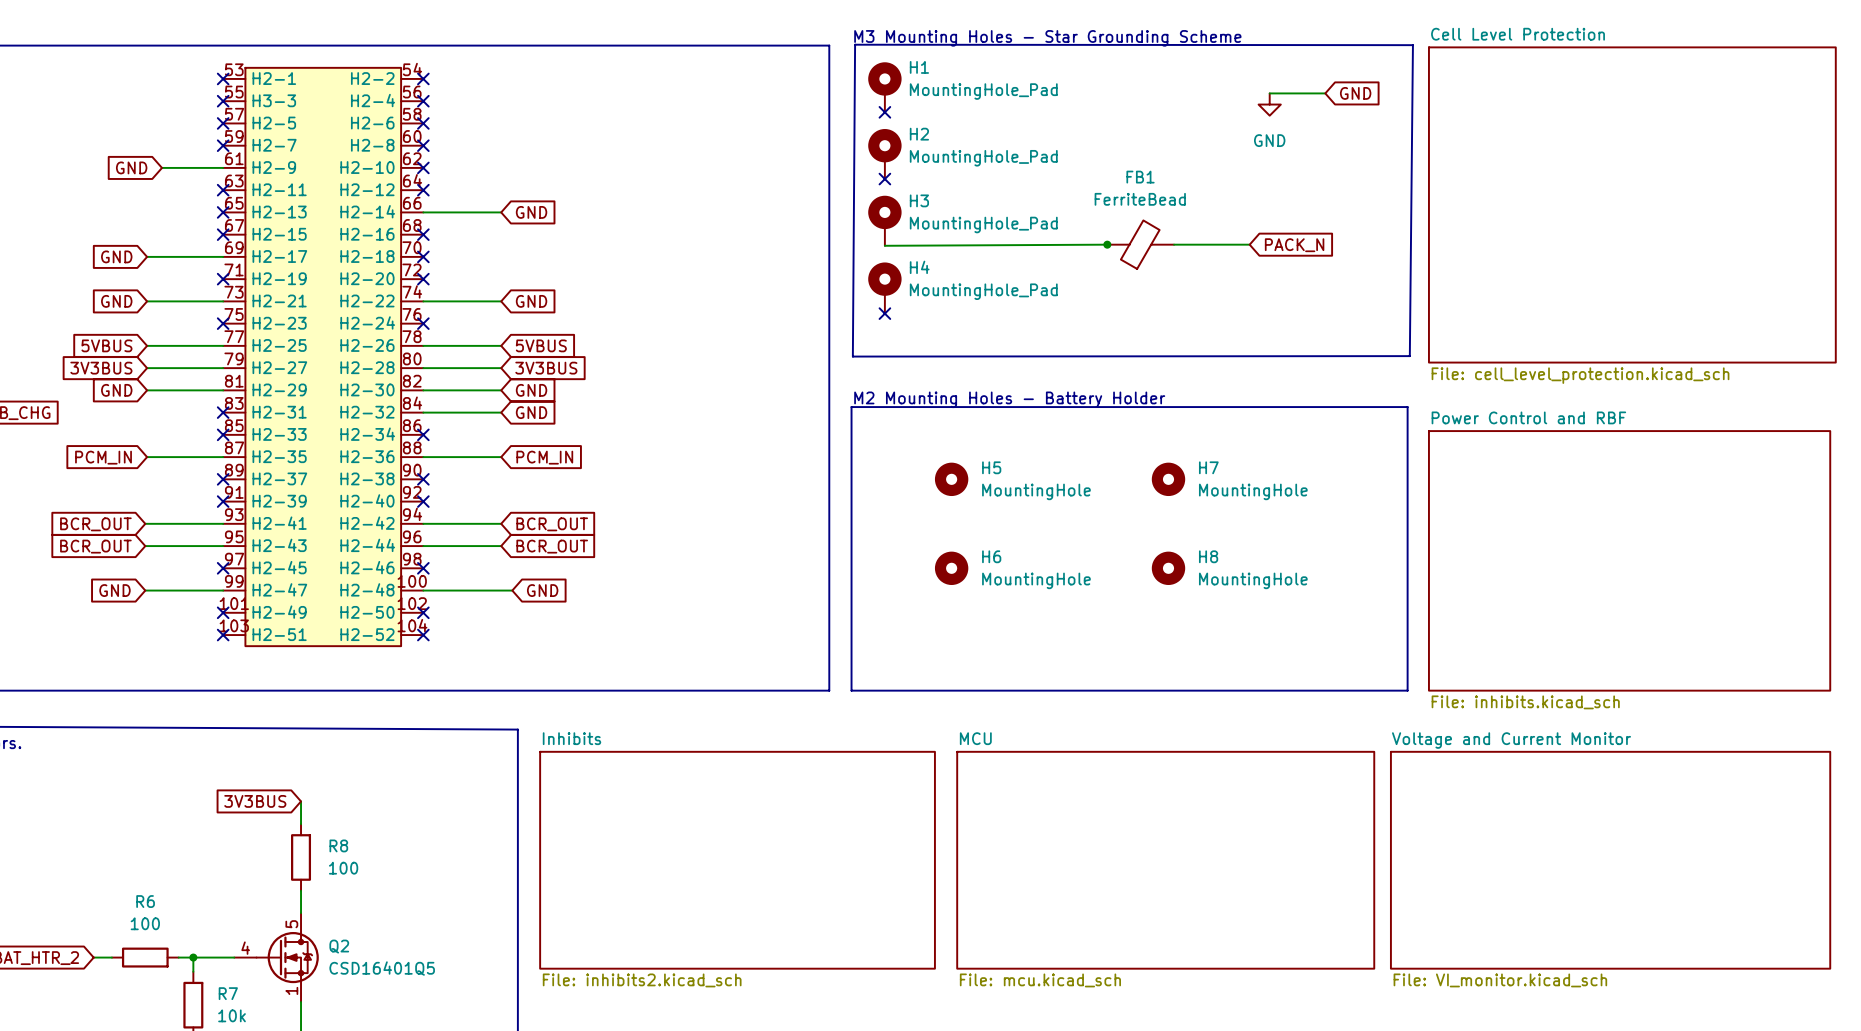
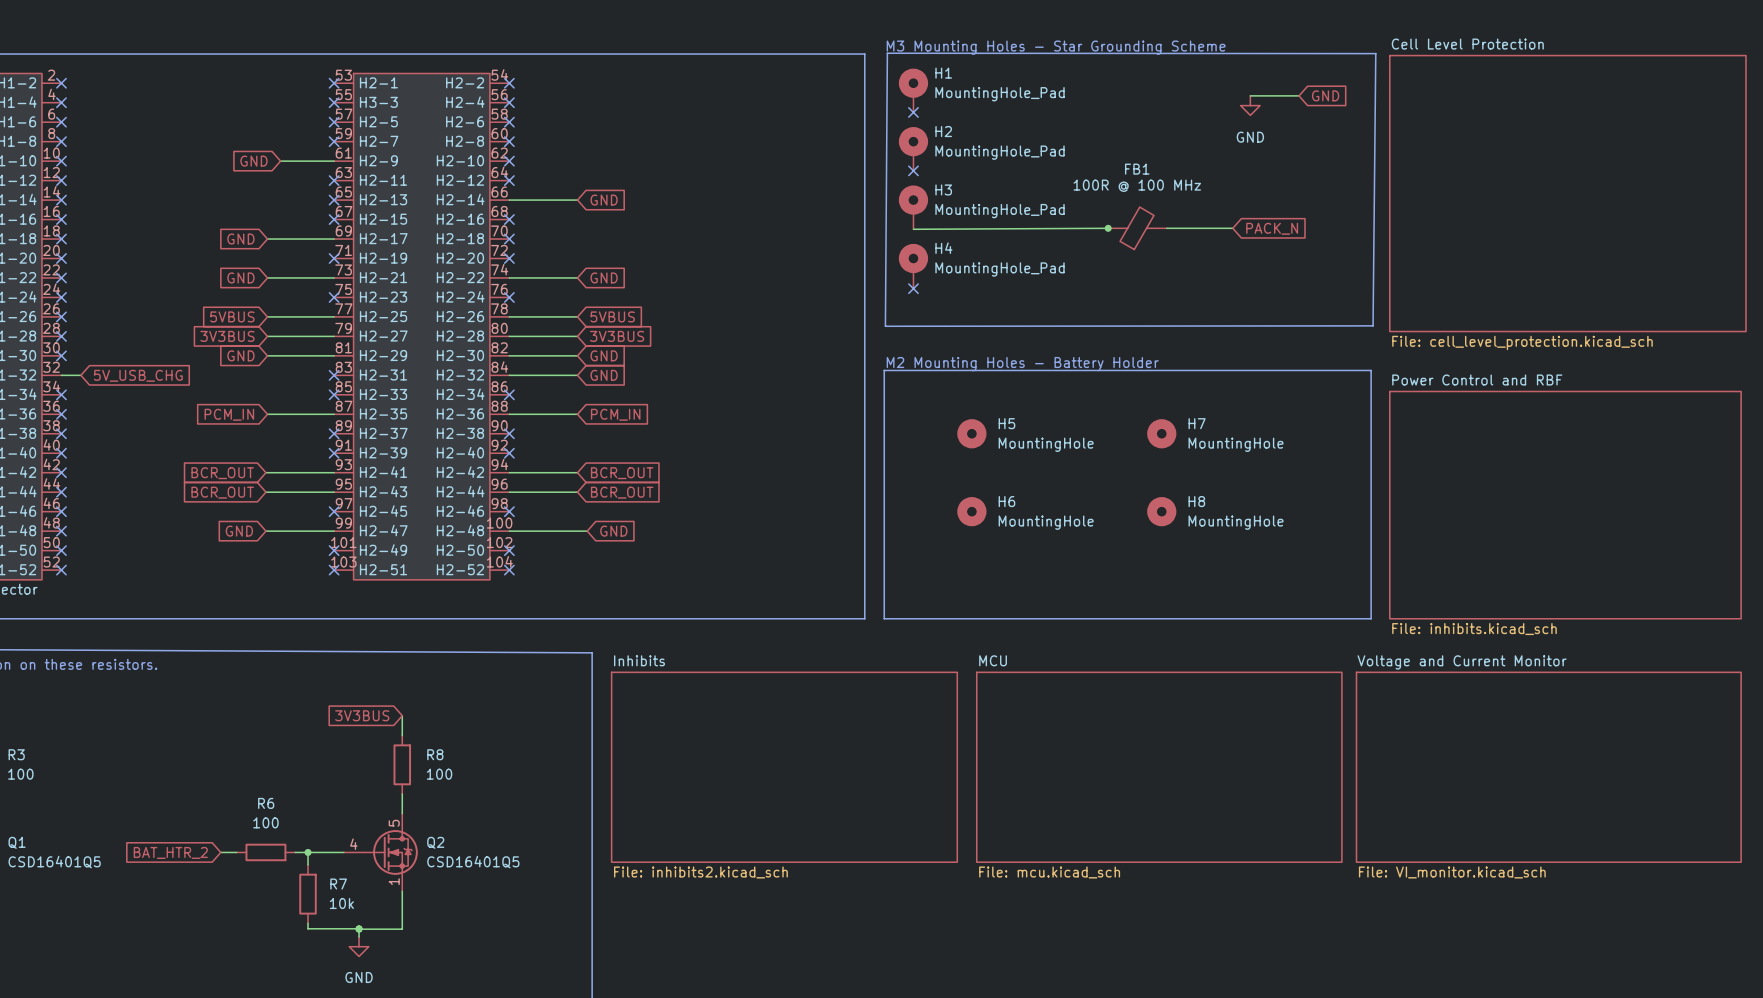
FB1 value: FerriteBead (1140, 199) -> 100R @ 100 MHz (1137, 185)

